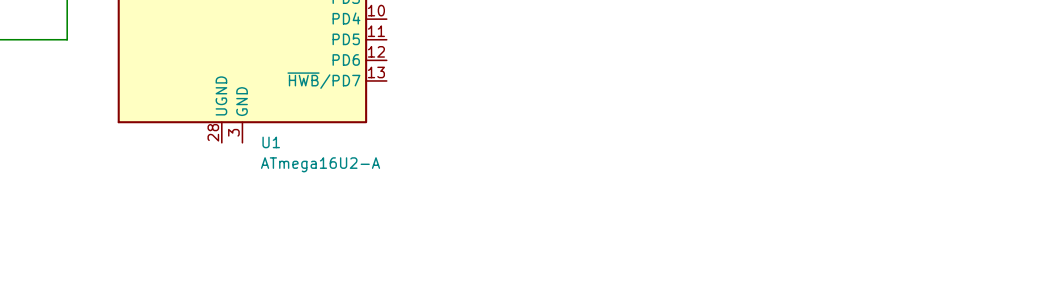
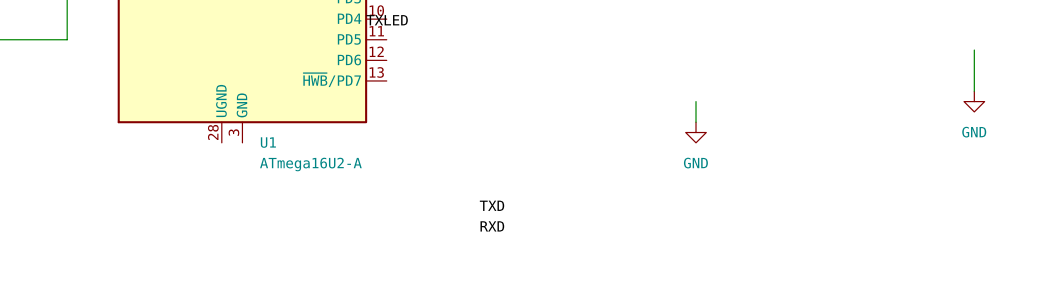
label: none -> TXLED (387, 20)
wire: none -> (974, 50) (974, 91)
wire: none -> (696, 101) (696, 122)
power symbol: none -> GND (974, 101)
power symbol: none -> GND (696, 132)
label: none -> TXD (492, 205)
label: none -> RXD (492, 226)

